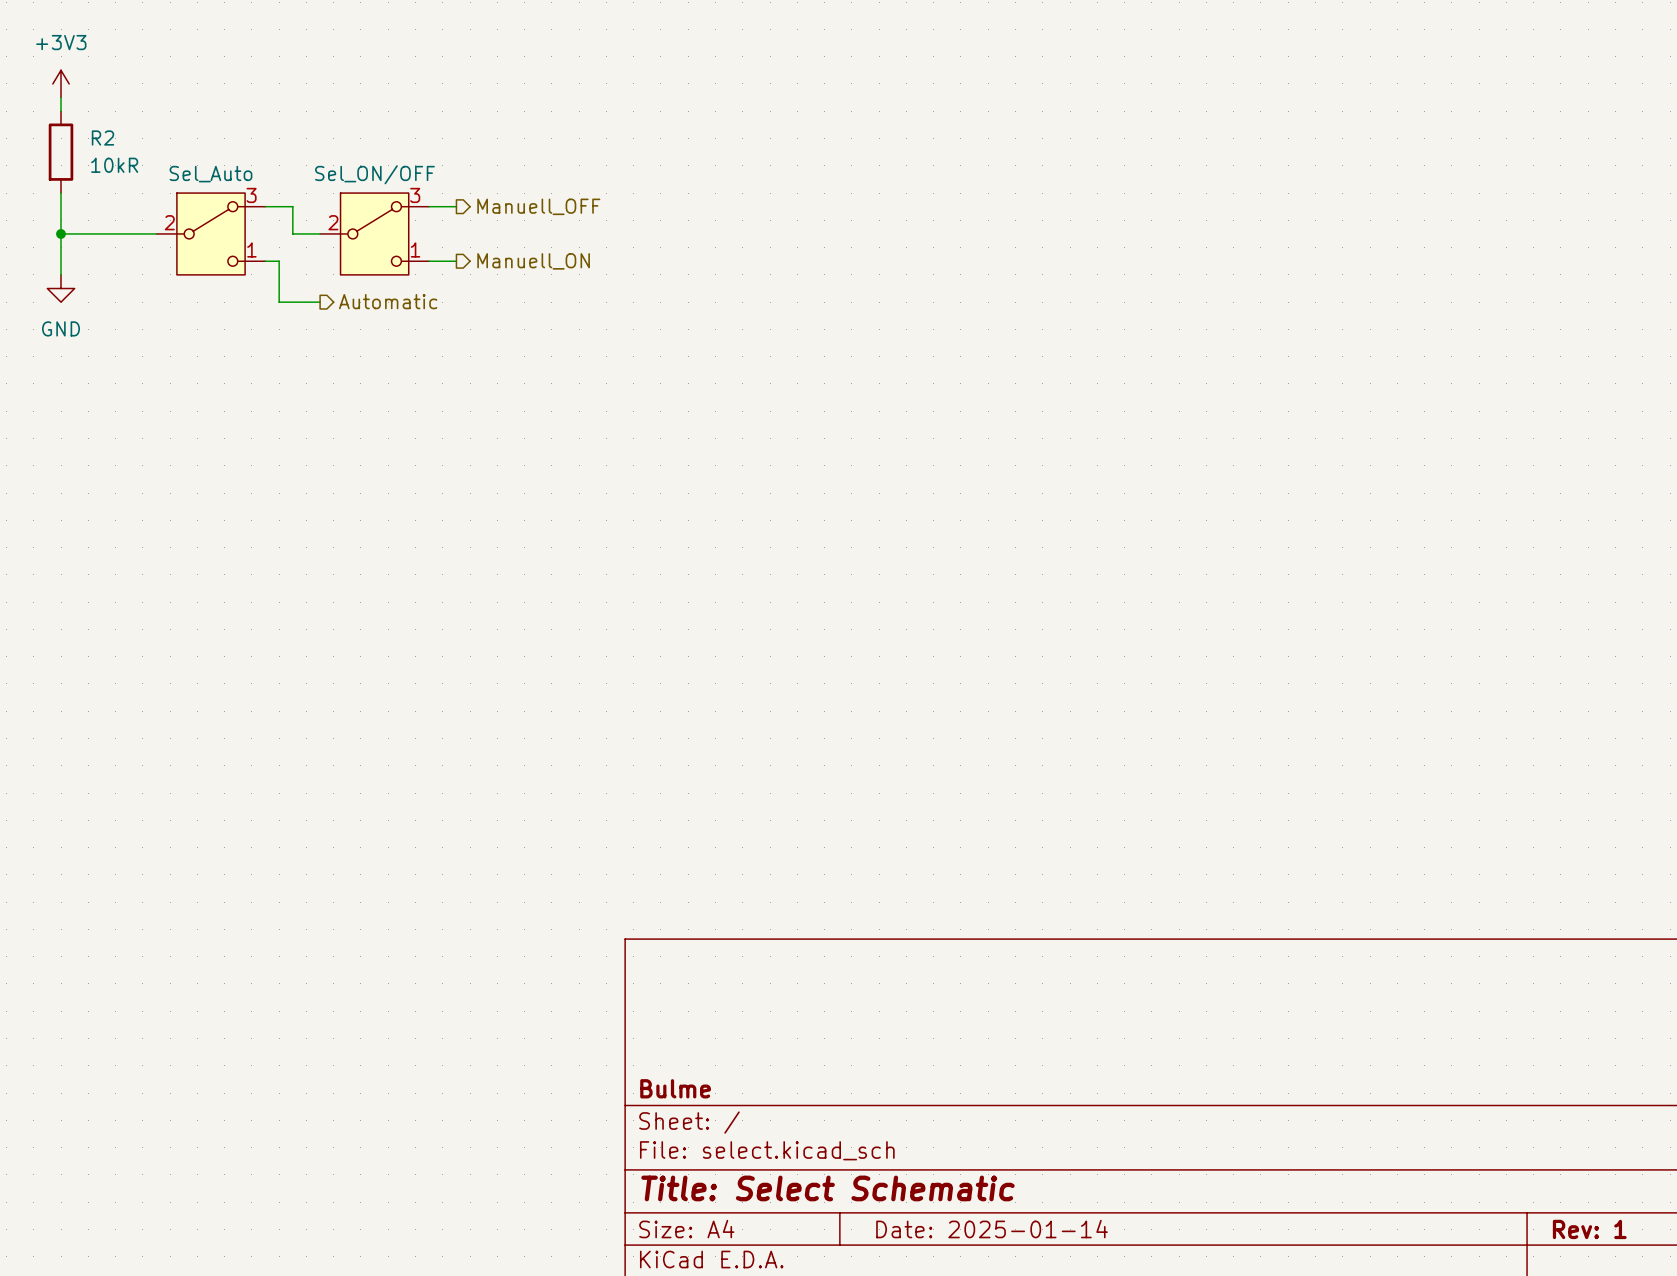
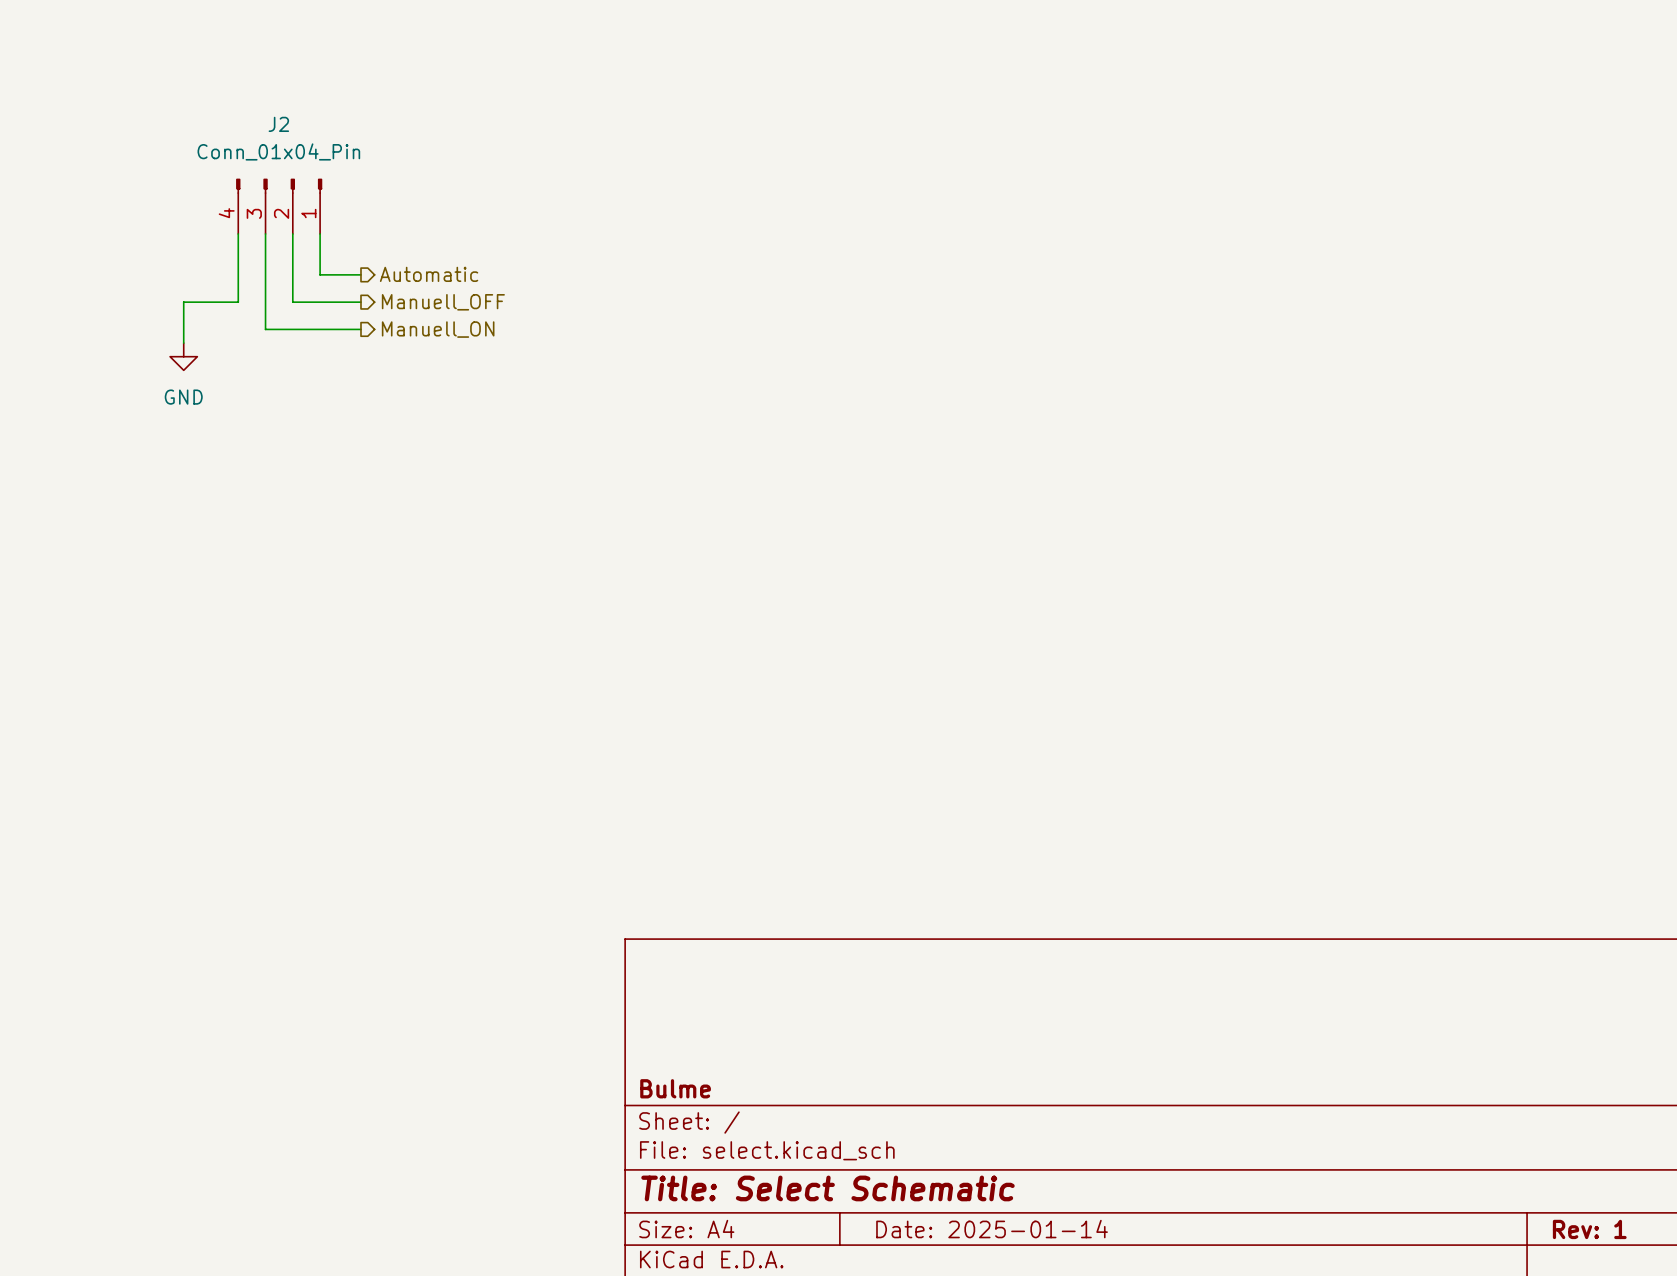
power symbol: +3V3 (61, 83) -> none
wire: (61, 97) (61, 111) -> none
R2: 10kR (61, 152) -> none
wire: (61, 193) (61, 274) -> none
wire: (265, 206) (292, 206) (292, 233) (320, 233) -> (360, 274) (320, 274) (320, 233)
J2: none -> Conn_01x04_Pin (279, 206)
wire: (429, 206) (456, 206) -> none
hierarchical label position: Manuell_OFF (538, 206) -> Manuell_OFF (443, 302)
wire: (61, 233) (156, 233) -> none
junction: (61, 233) -> none
Sel_Auto: (210, 233) -> none
wire: none -> (238, 233) (238, 302) (183, 302) (183, 343)
wire: none -> (265, 233) (265, 329) (360, 329)
Sel_ON/OFF: (374, 233) -> none
wire: (265, 261) (279, 261) (279, 302) (292, 302) -> (292, 233) (292, 302)
wire: (429, 261) (456, 261) -> none
hierarchical label position: Manuell_ON (533, 261) -> Manuell_ON (438, 329)
power symbol position: GND (61, 288) -> GND (183, 356)
hierarchical label position: Automatic (388, 301) -> Automatic (429, 274)
wire: none -> (320, 302) (360, 302)

